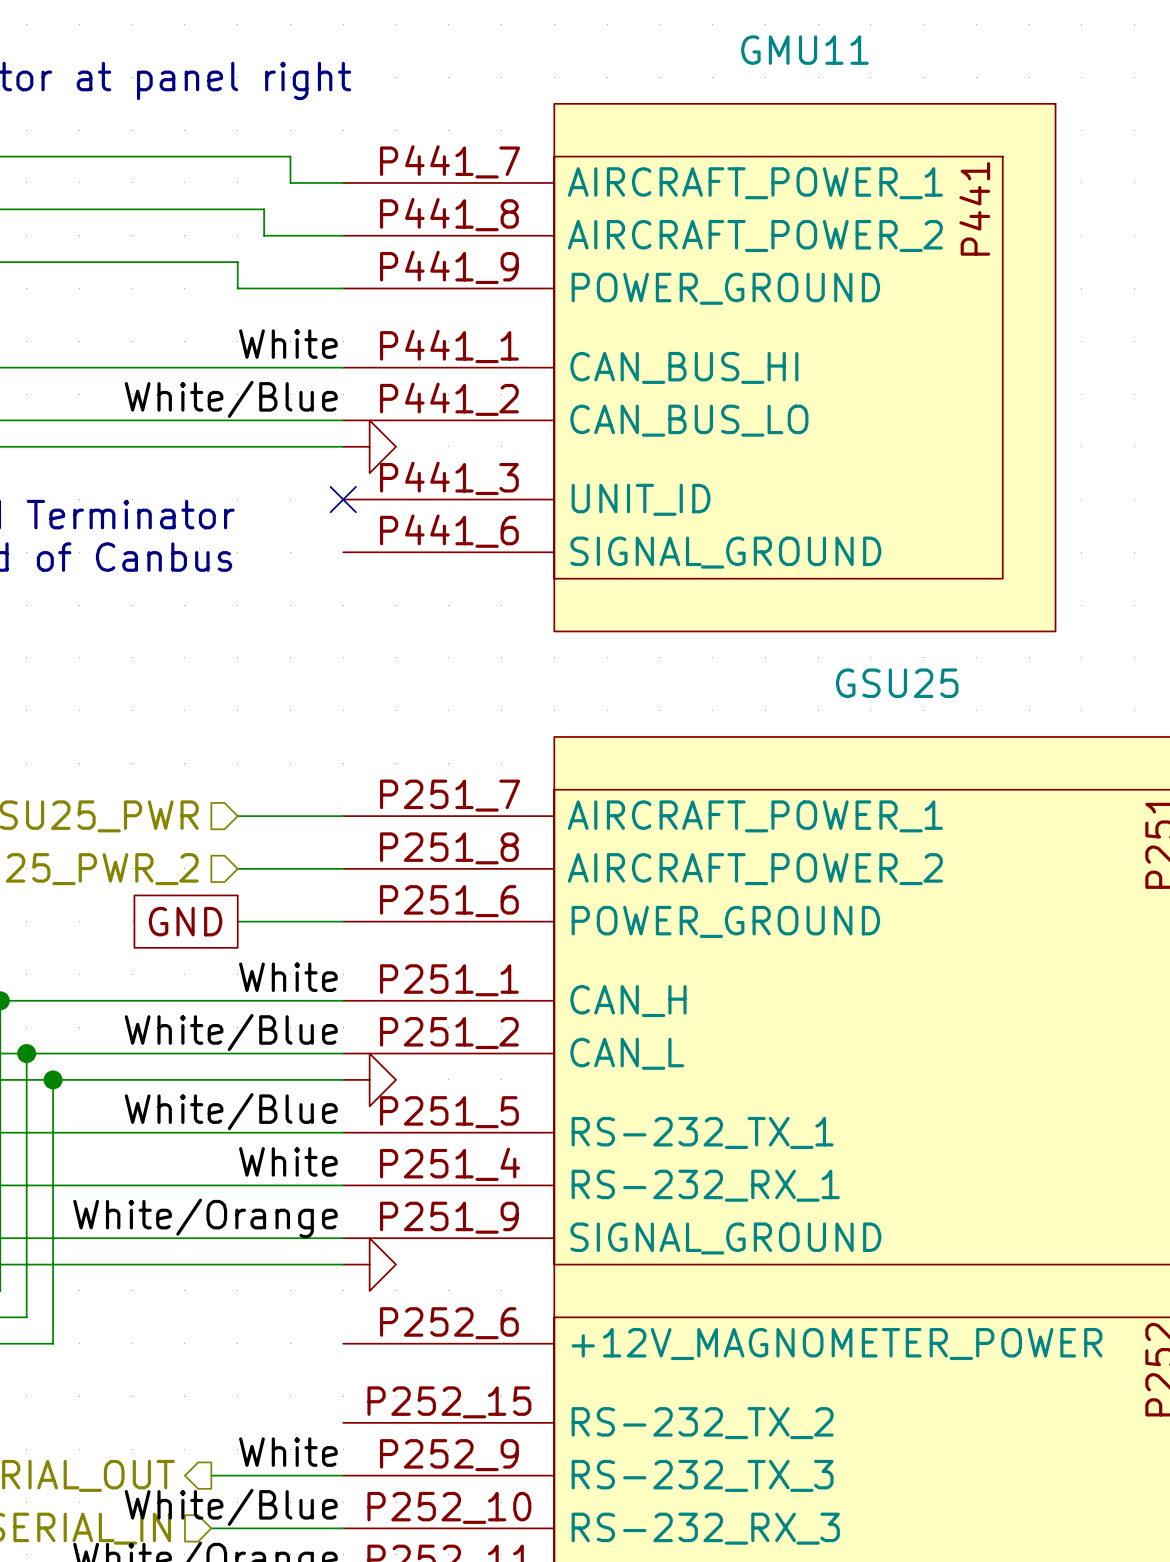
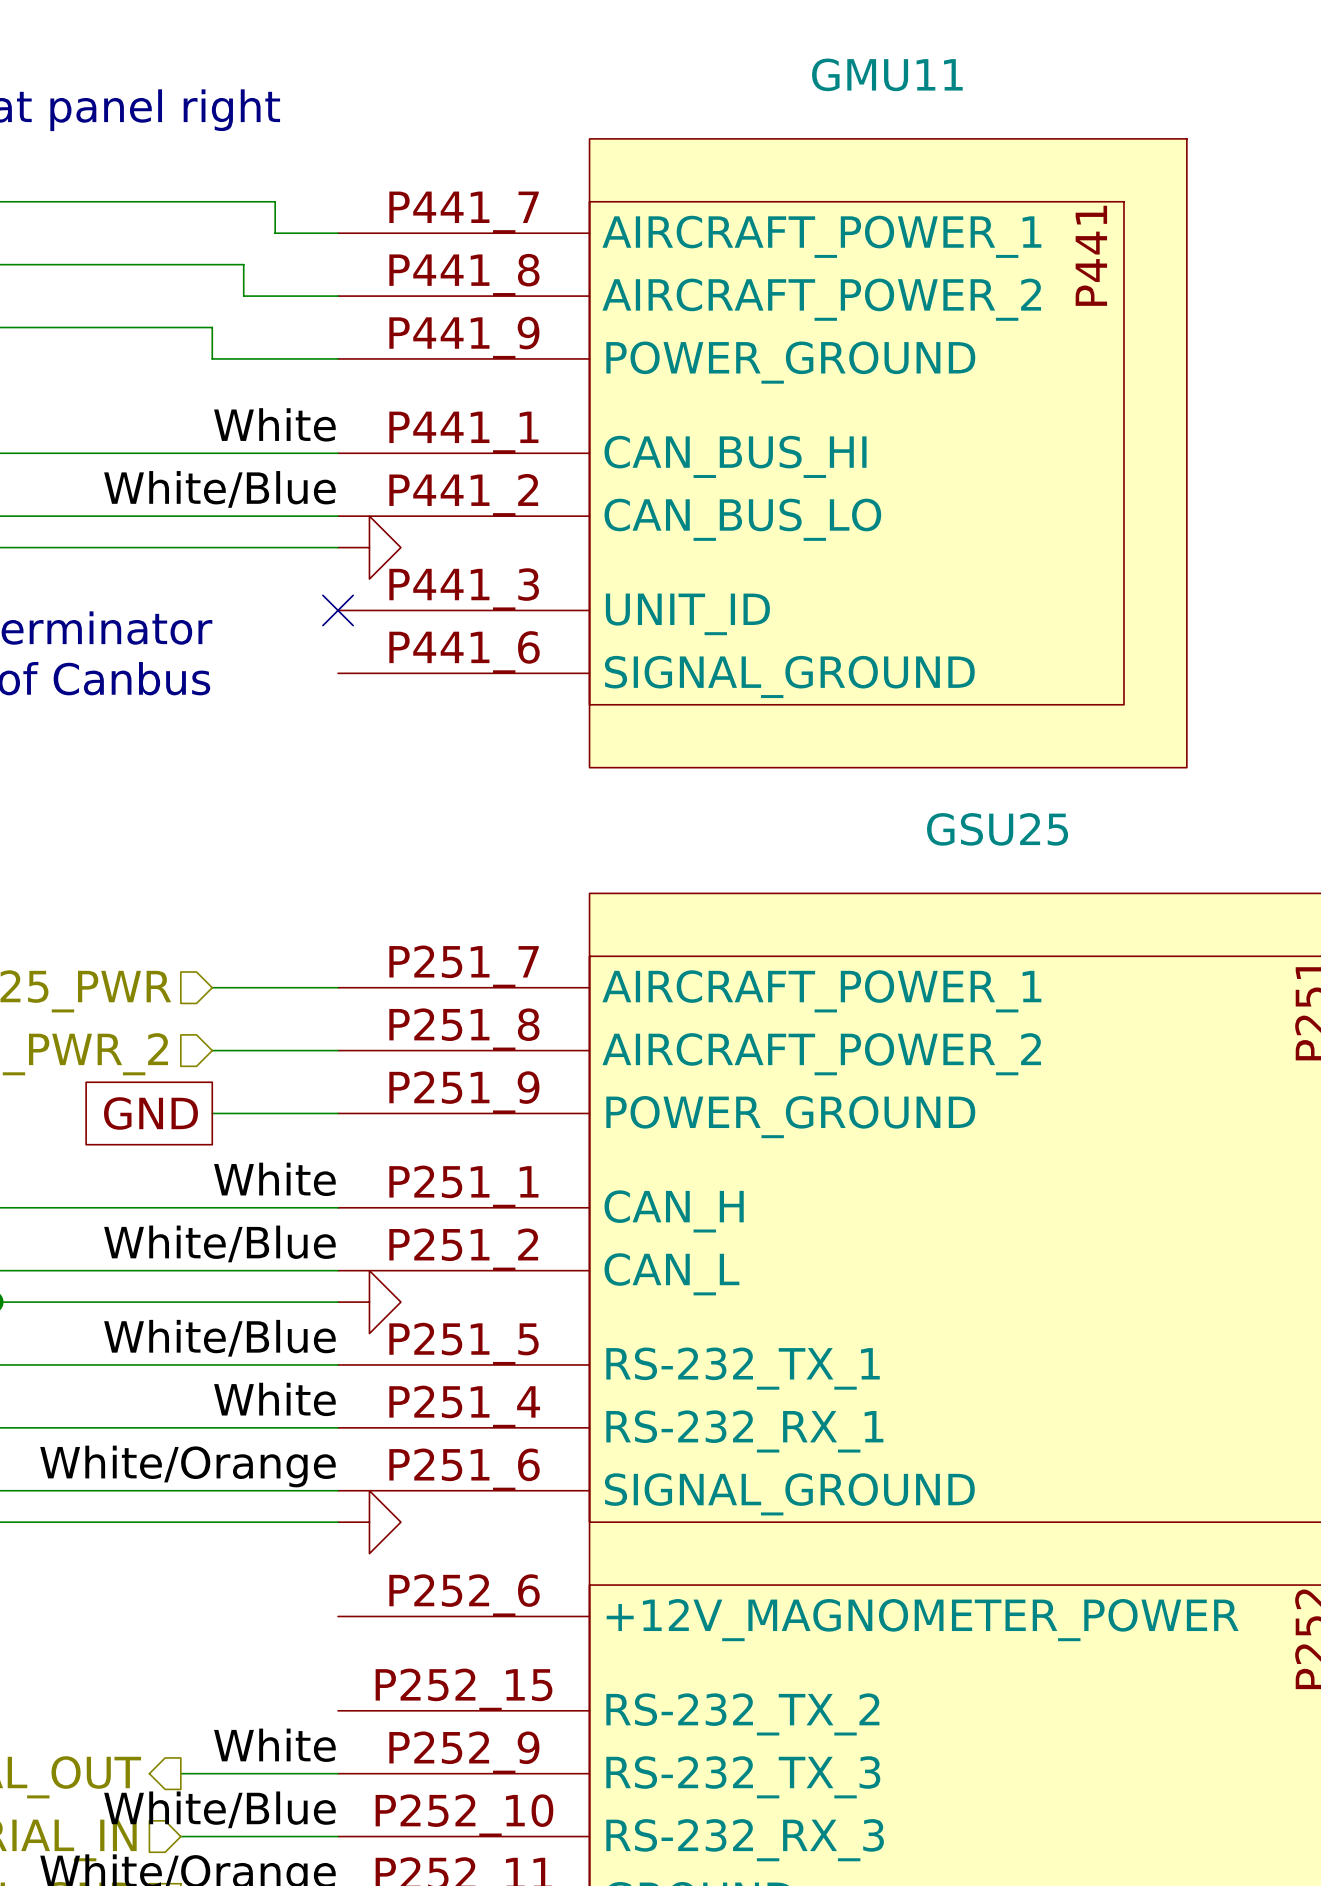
GSU25 pin number: P251_6 (449, 901) -> P251_9 (464, 1092)
GSU25 pin number: P251_9 (449, 1217) -> P251_6 (464, 1469)

